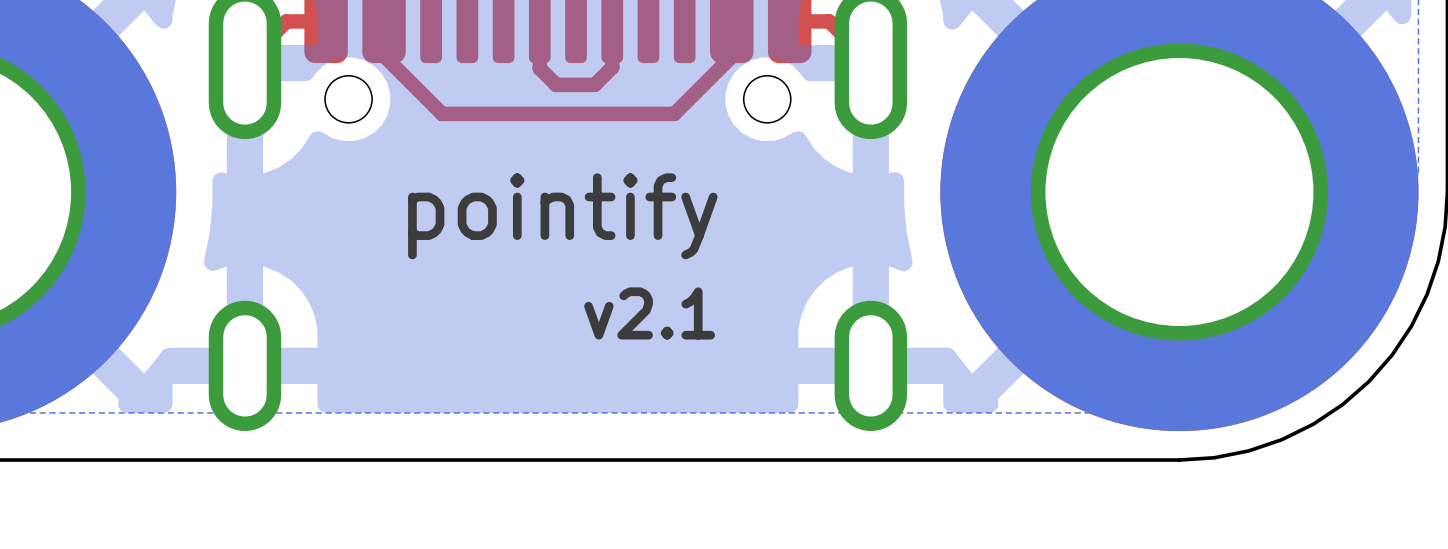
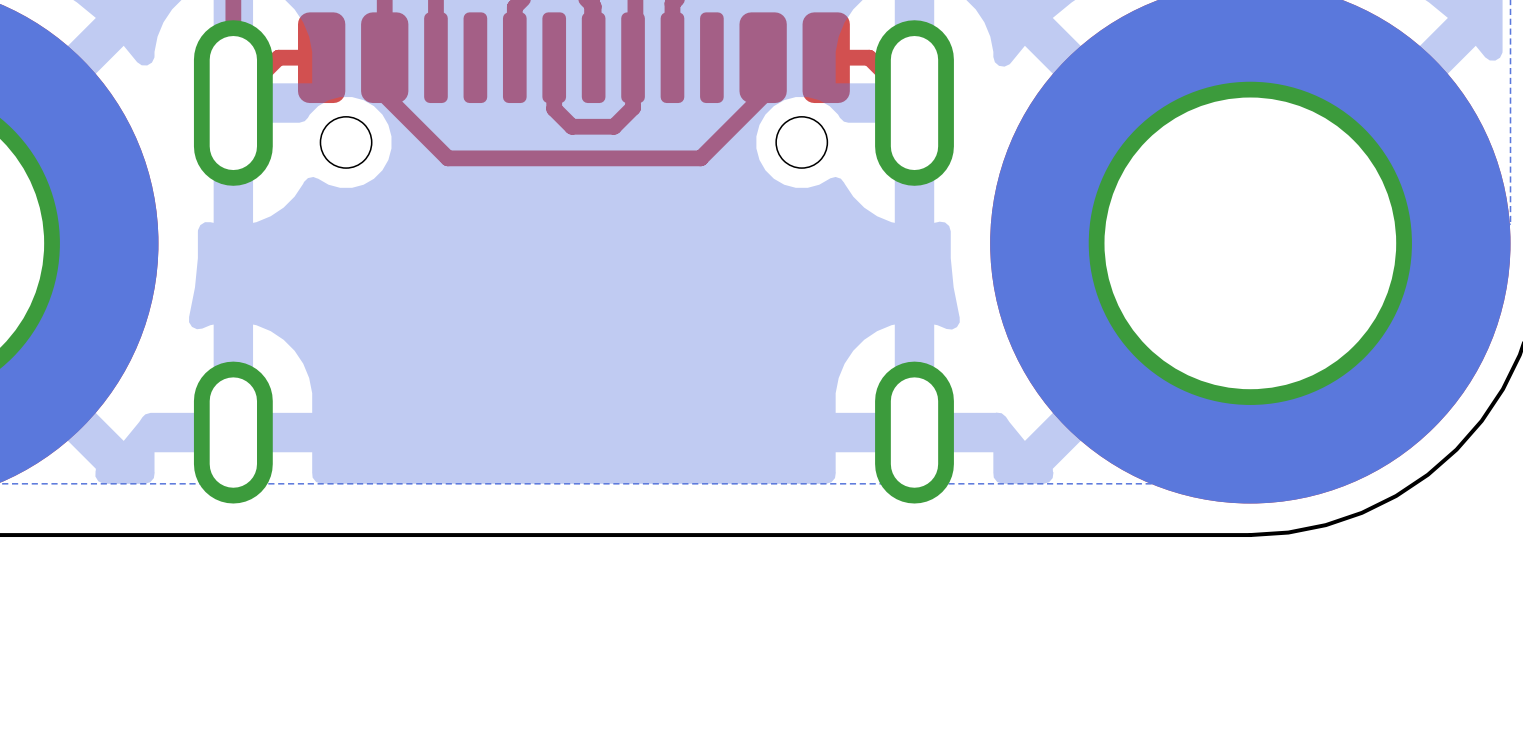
text: pointify (562, 216) -> none
text: v2.1 (649, 313) -> none

